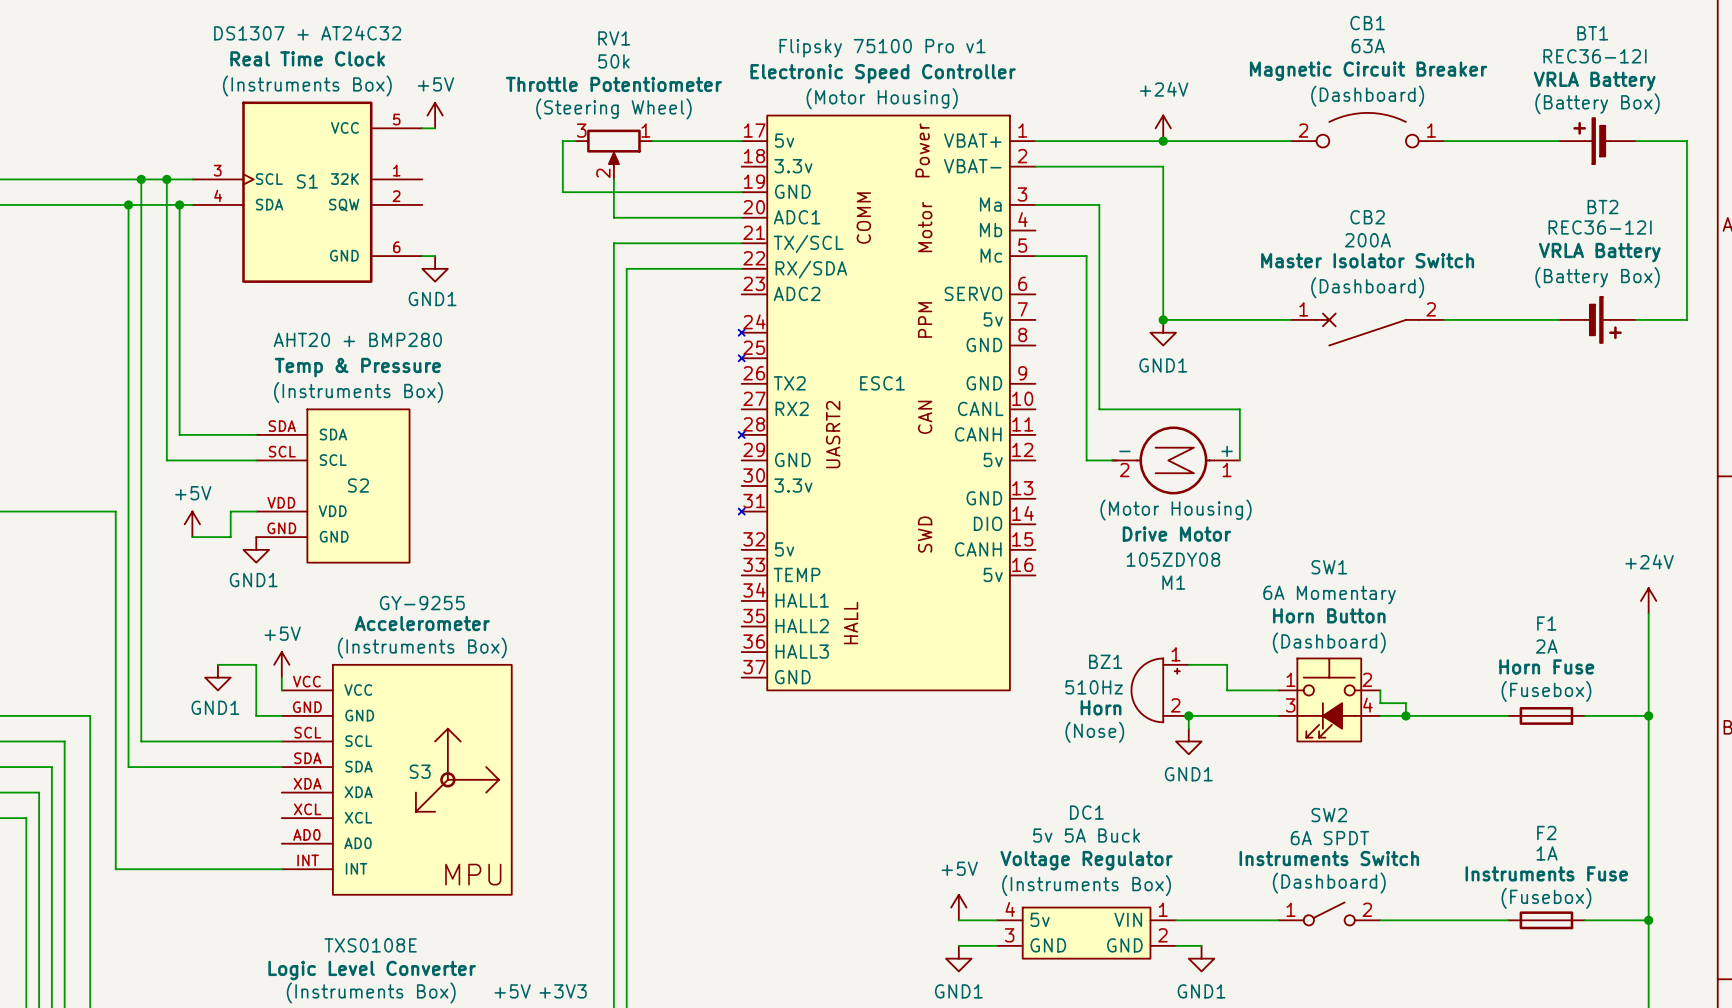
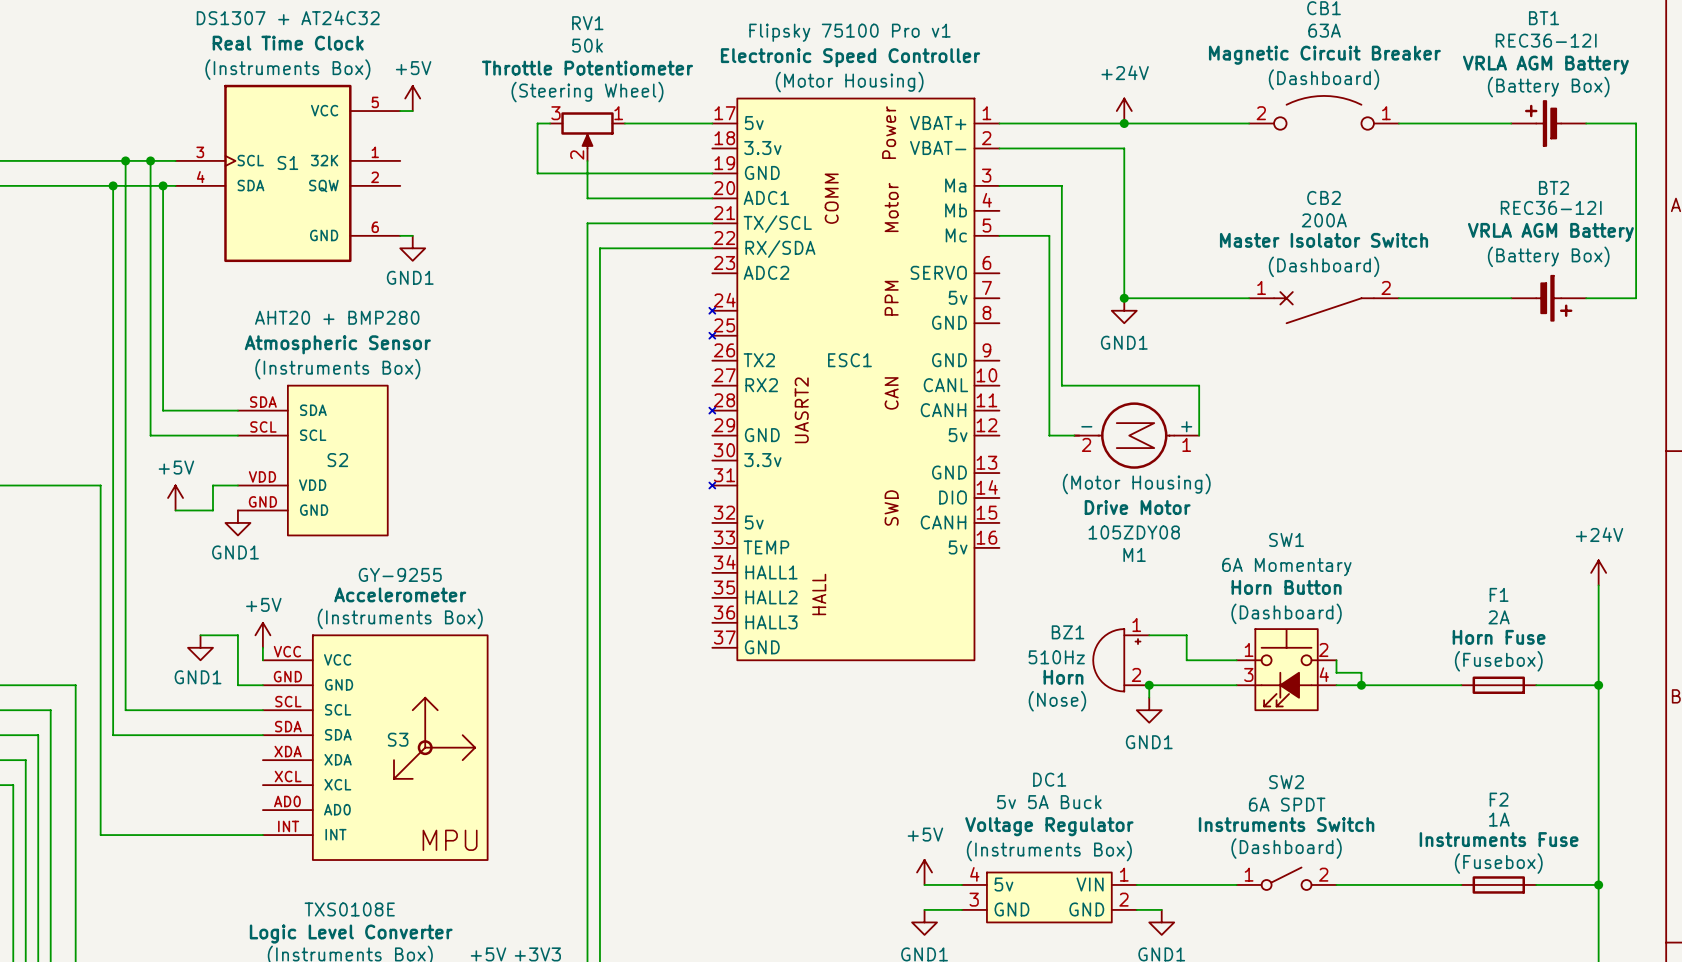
BT1 text: VRLA Battery (1594, 81) -> VRLA AGM Battery (1545, 65)
BT2 text: VRLA Battery (1599, 252) -> VRLA AGM Battery (1550, 232)
S2 text: Temp & Pressure (357, 367) -> Atmospheric Sensor (337, 344)

